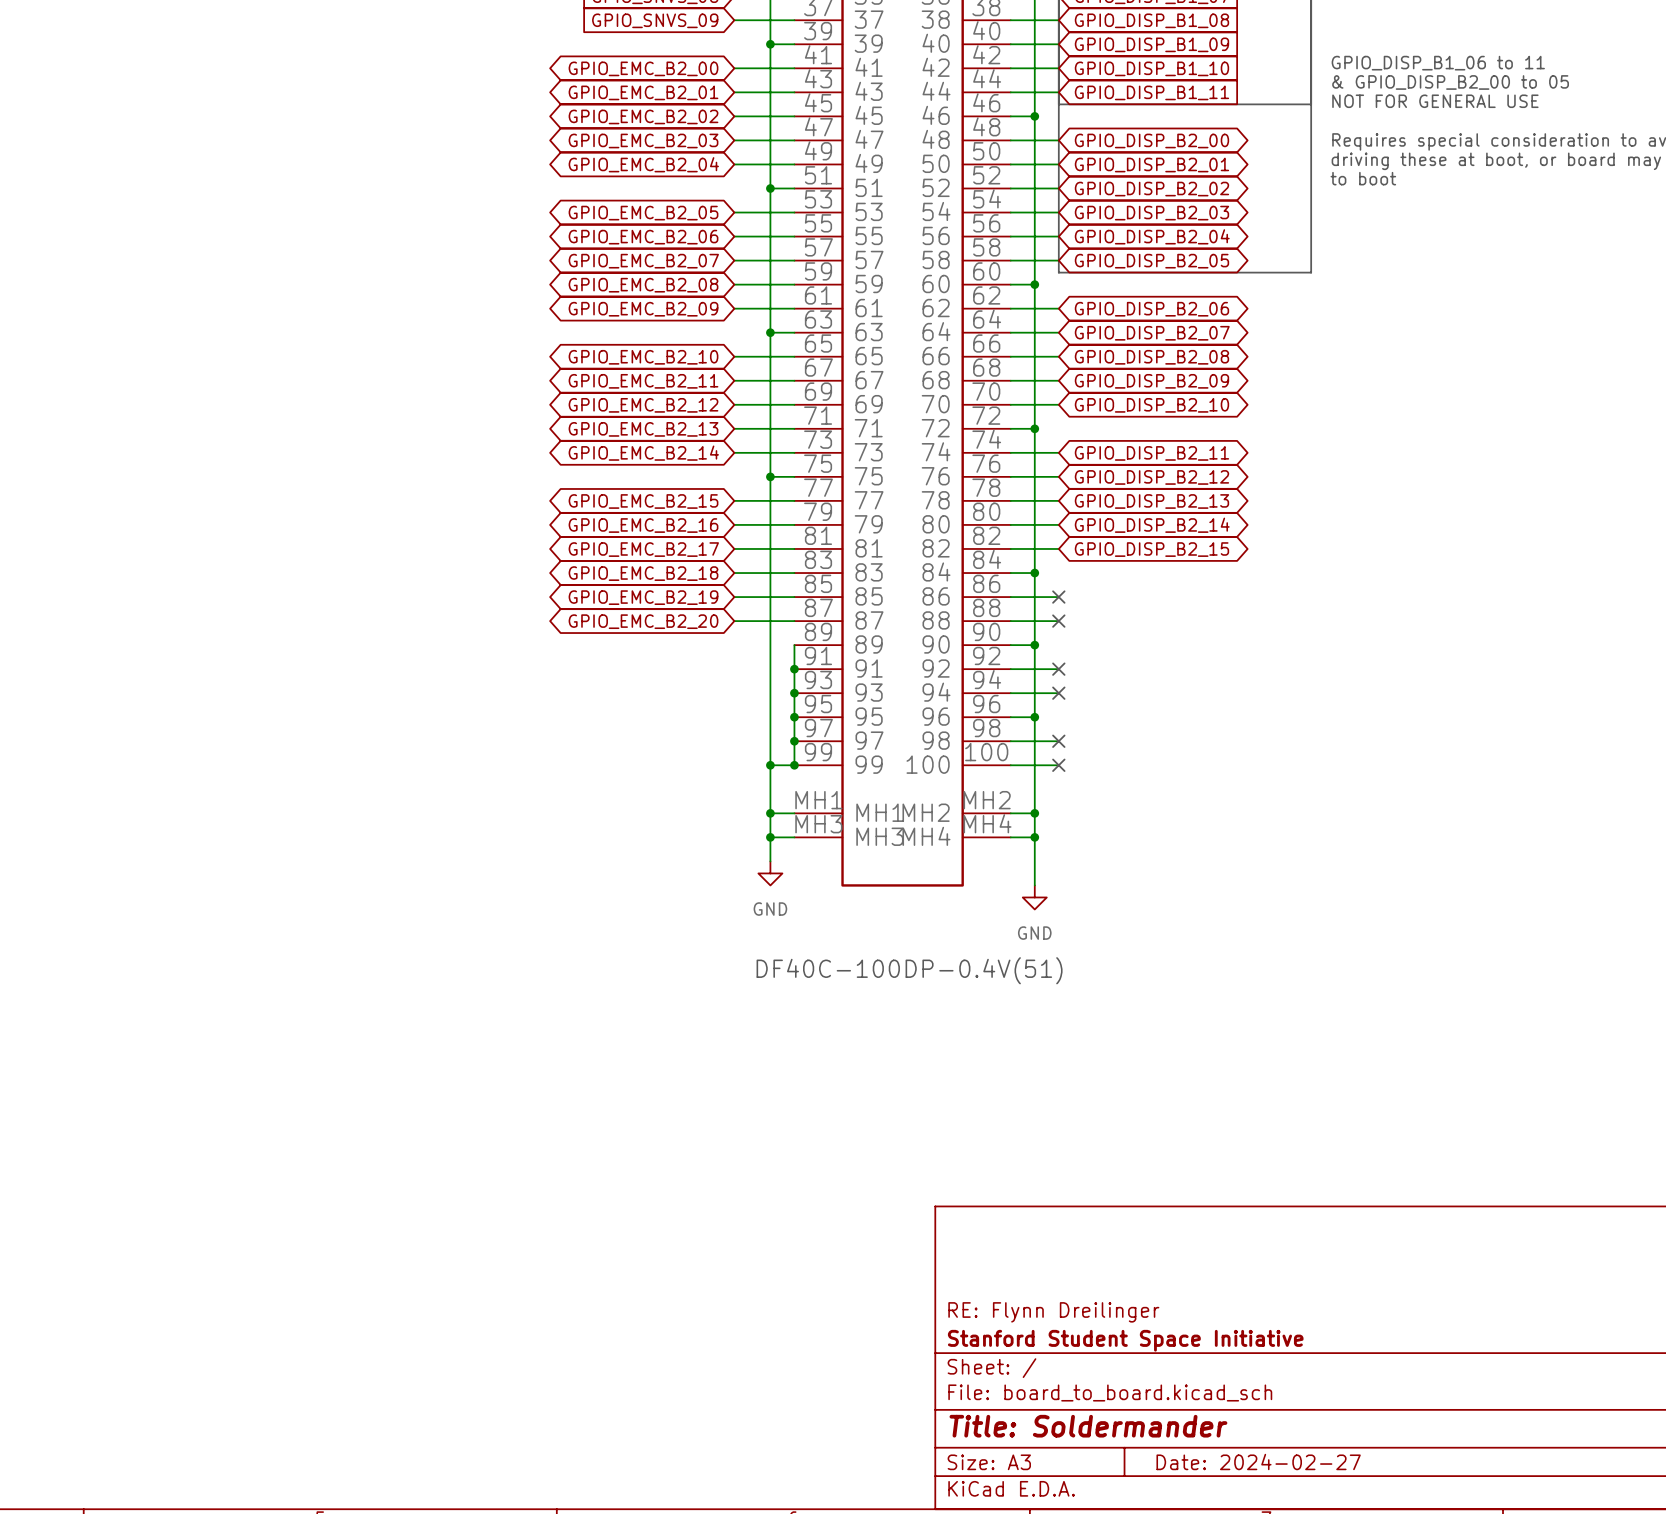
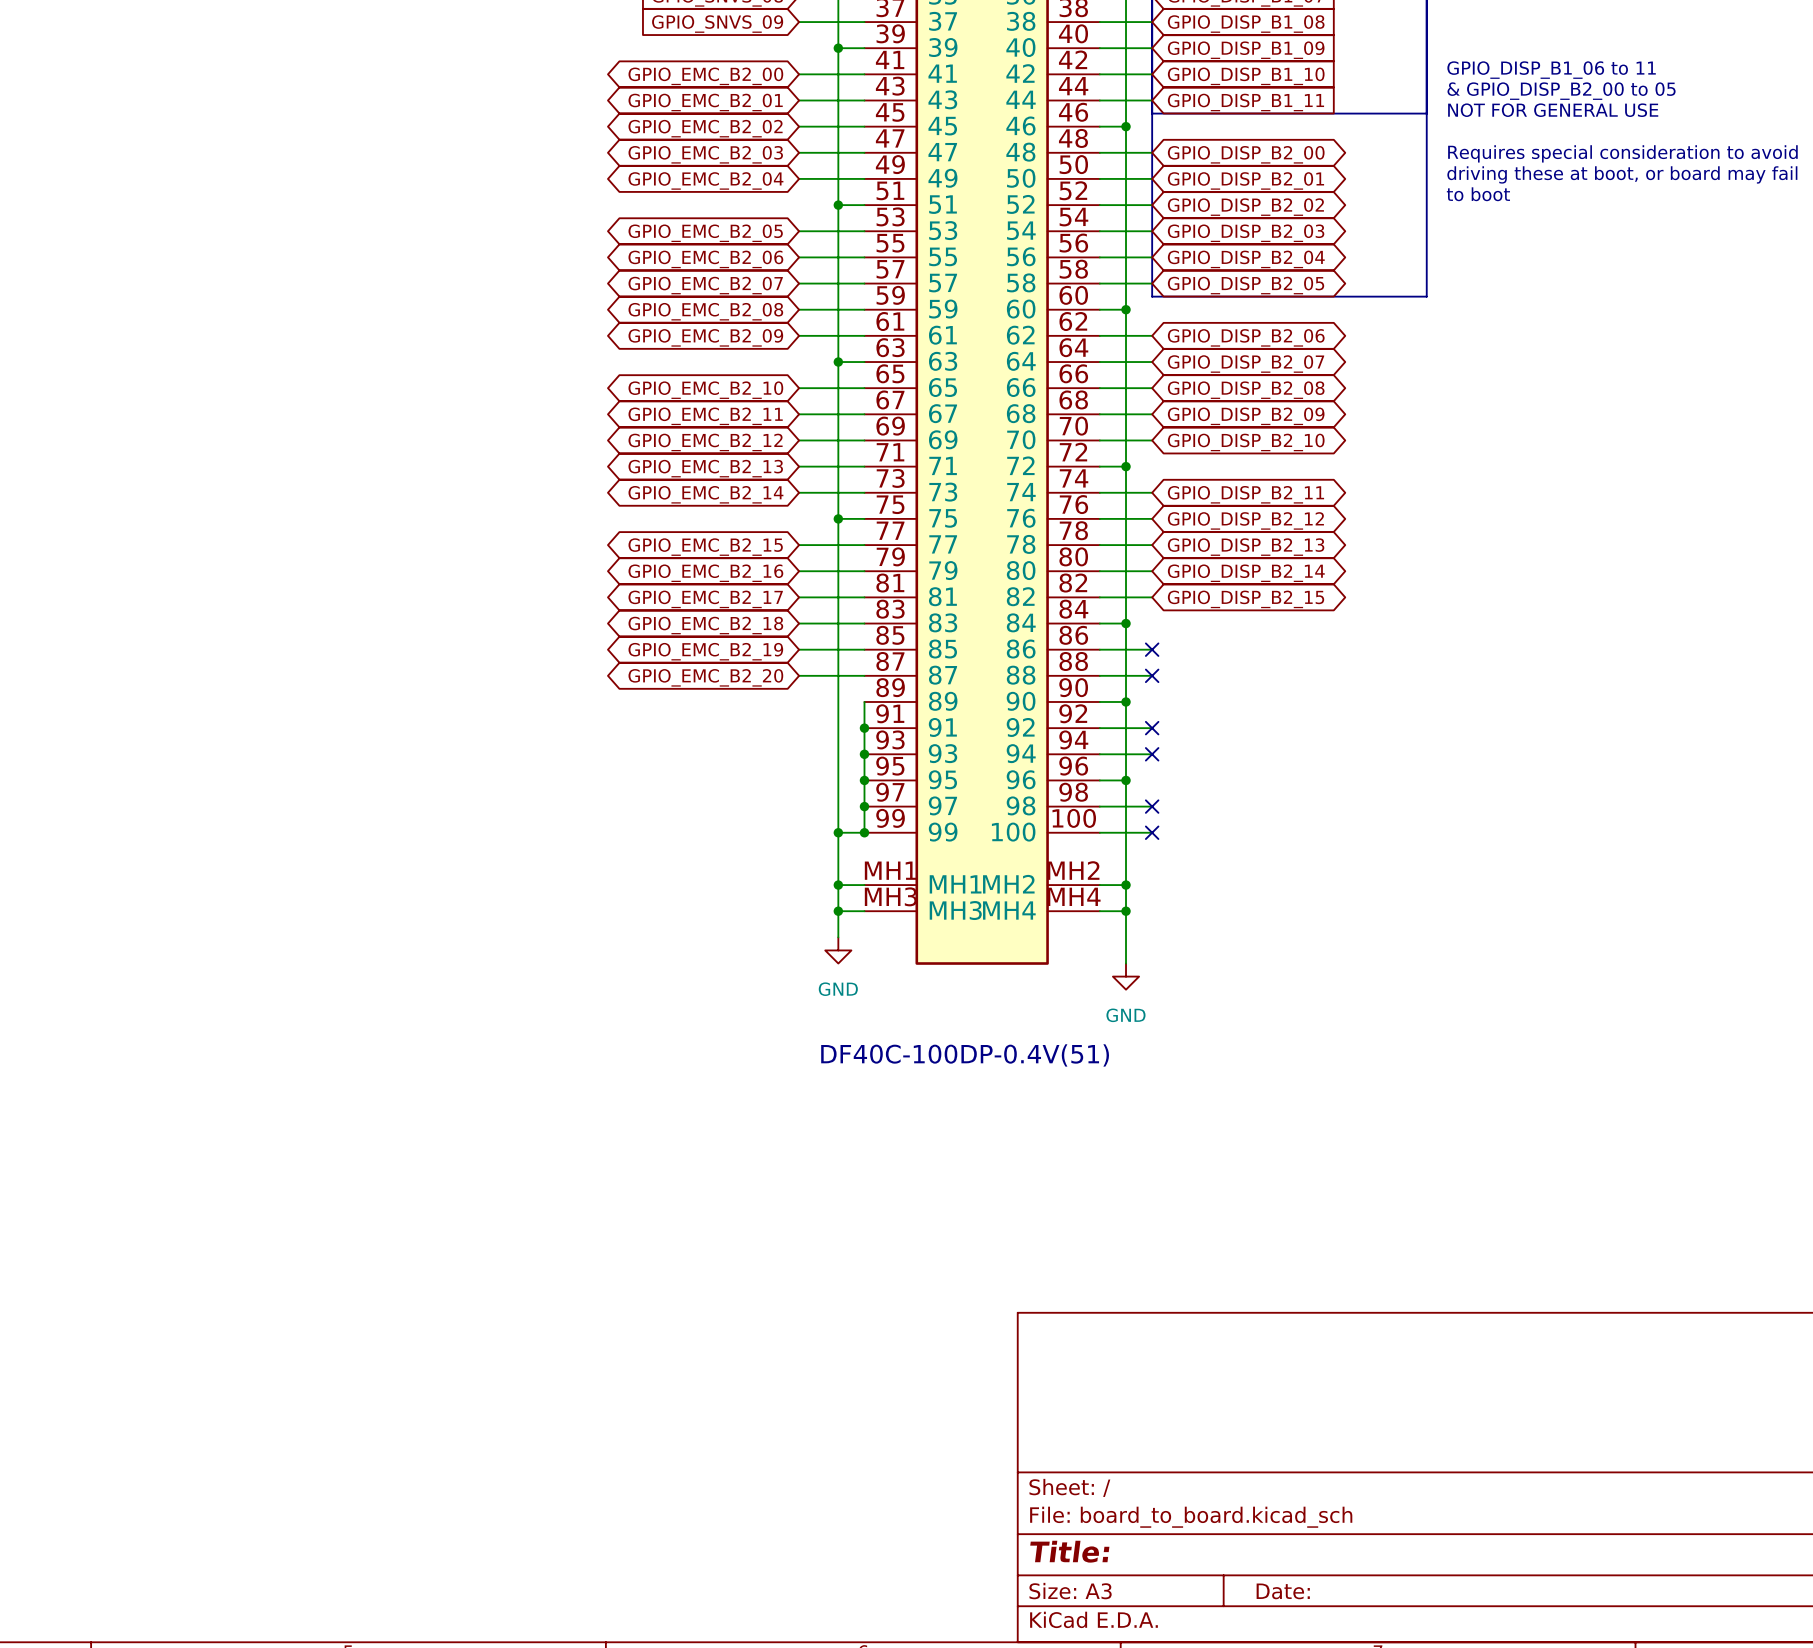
title block: RE: Flynn Dreilinger (1053, 1312) -> none
title block: Stanford Student Space Initiative (1125, 1340) -> none
title block: Title: Soldermander (1088, 1426) -> Title: (1069, 1551)
title block: Date: 2024-02-27 (1258, 1461) -> Date: (1283, 1591)

